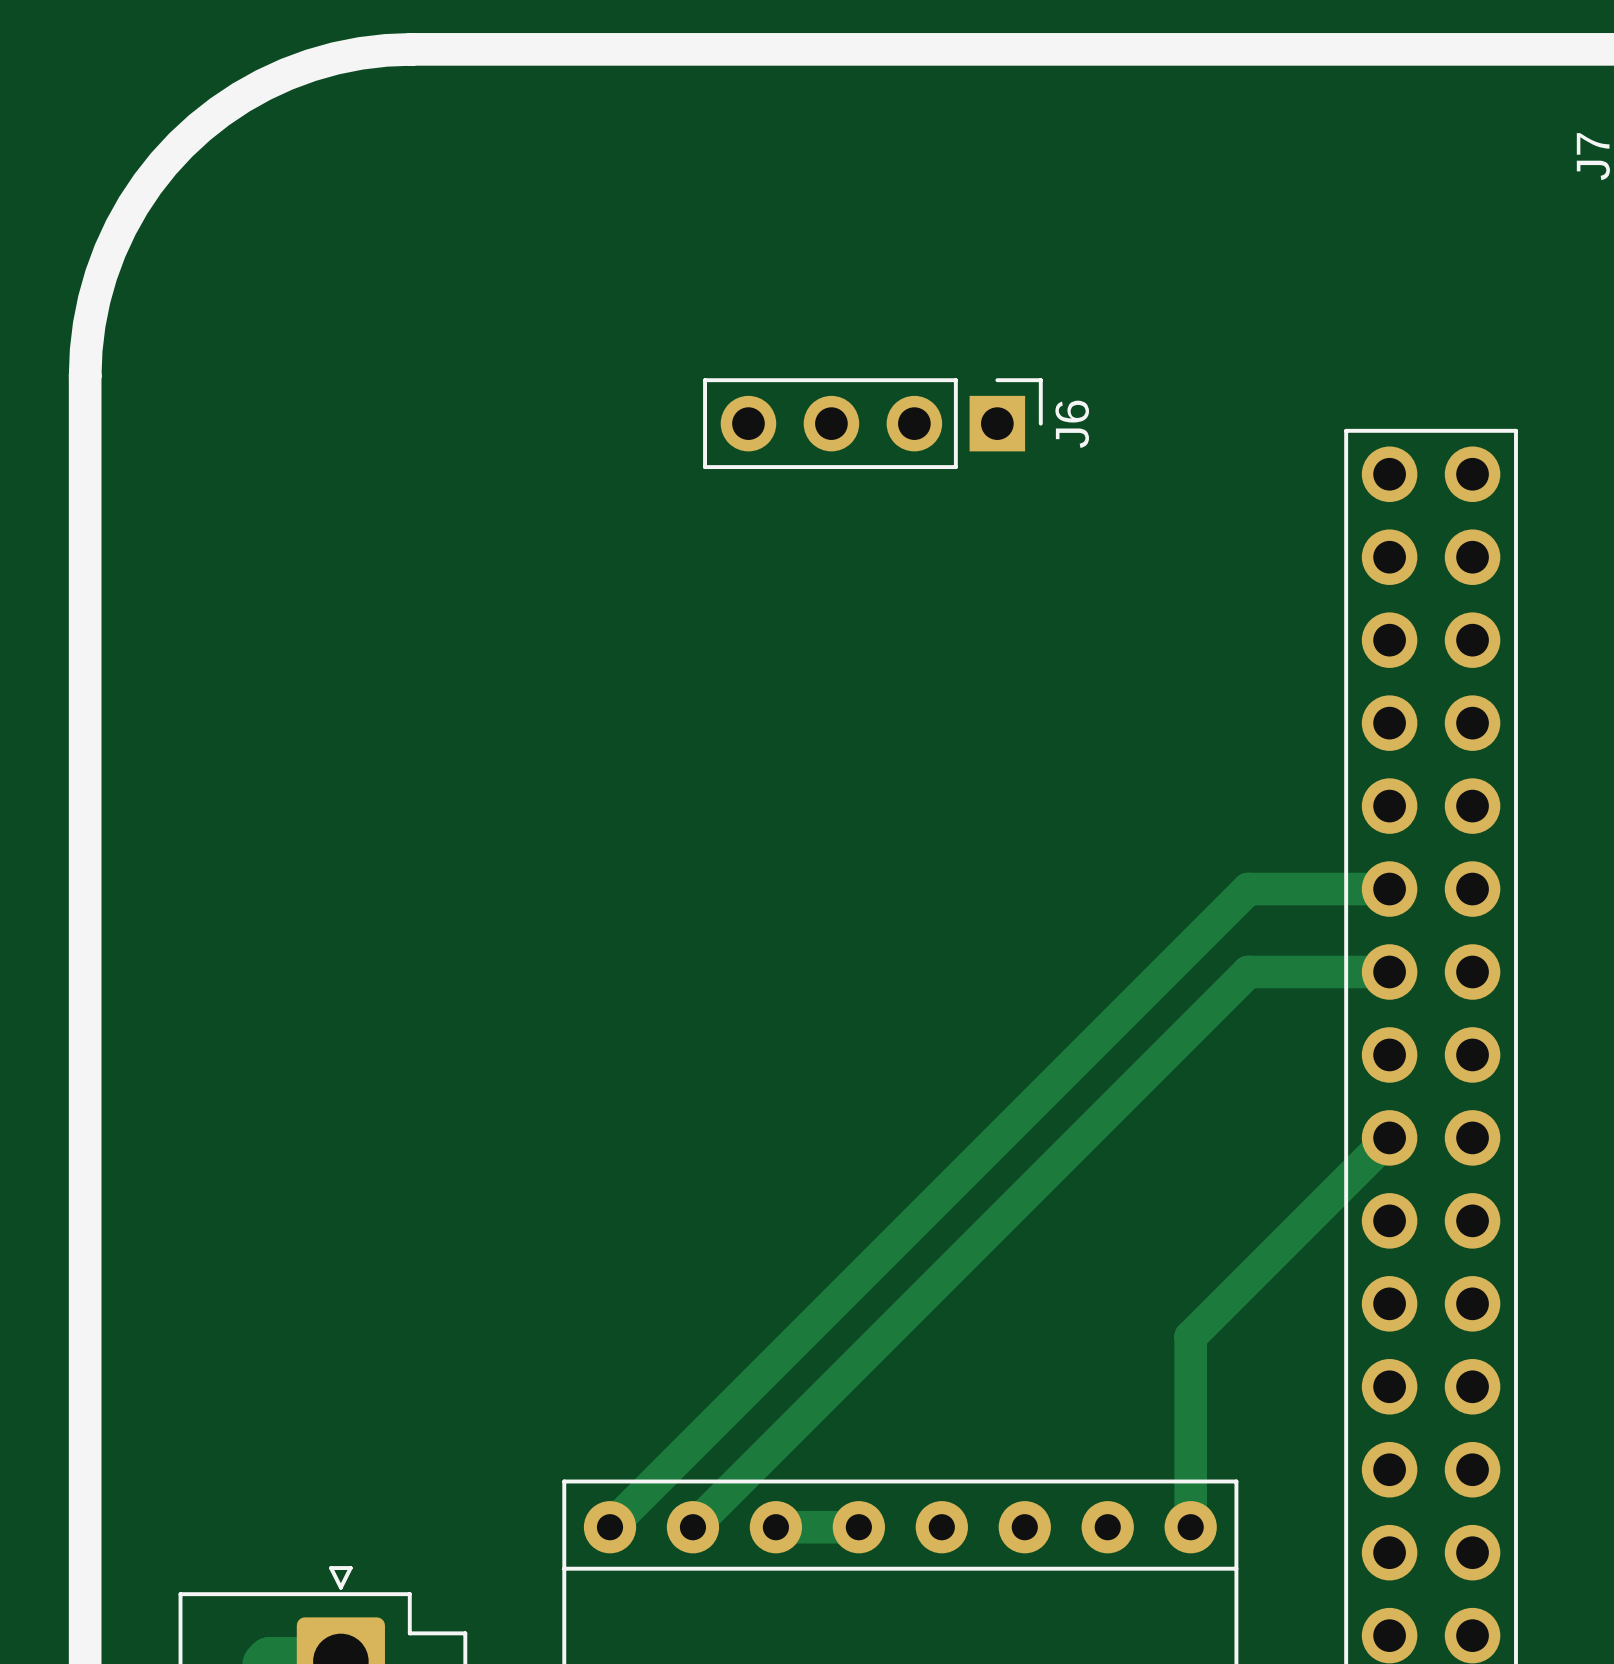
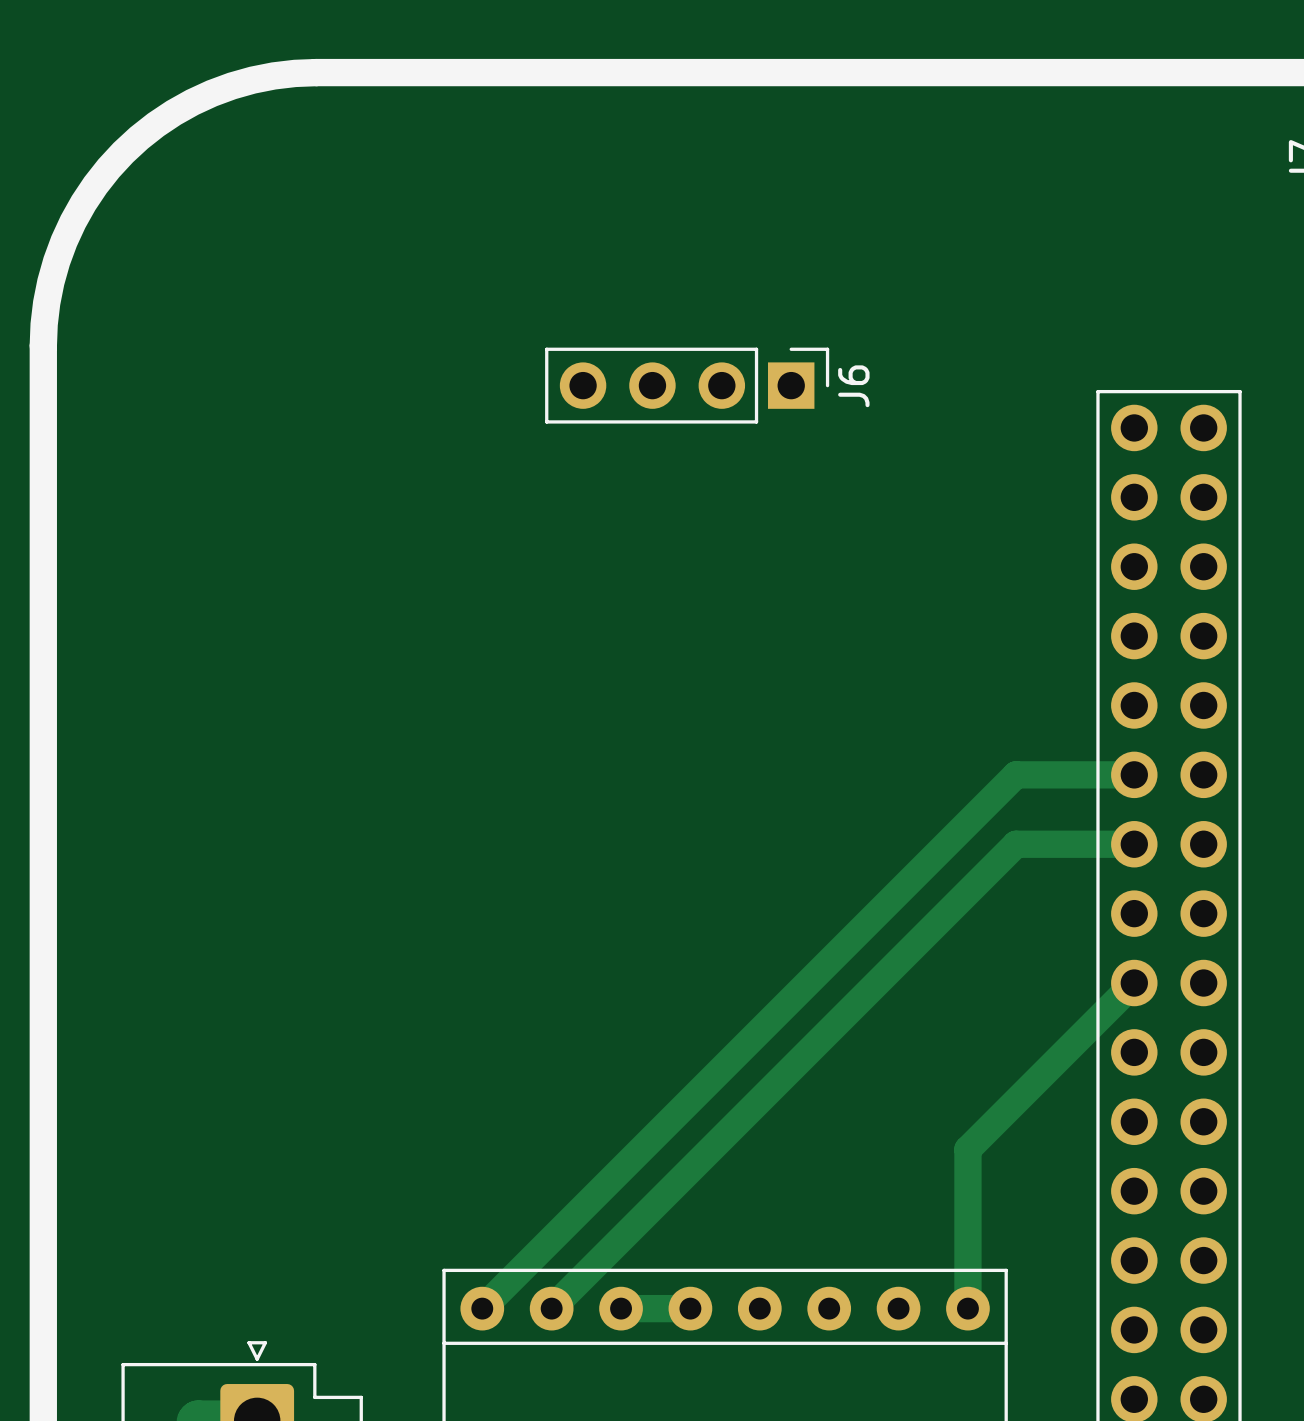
J6 position: (872, 423) -> (687, 385)

